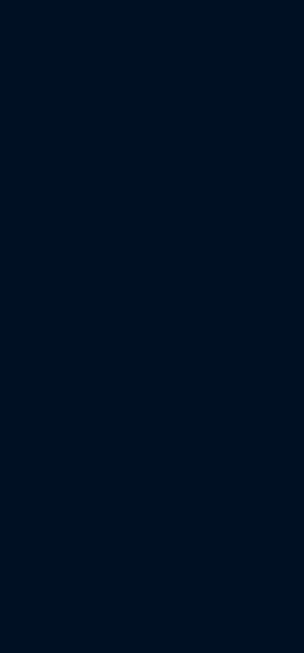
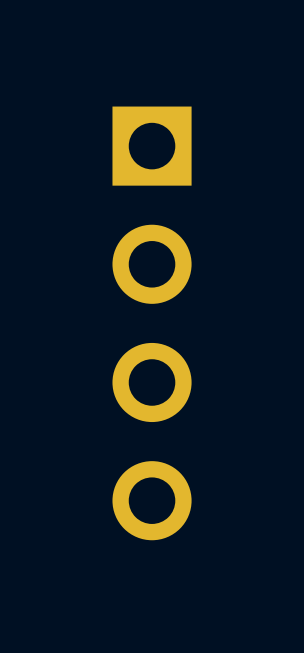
part: none -> (152, 323)

